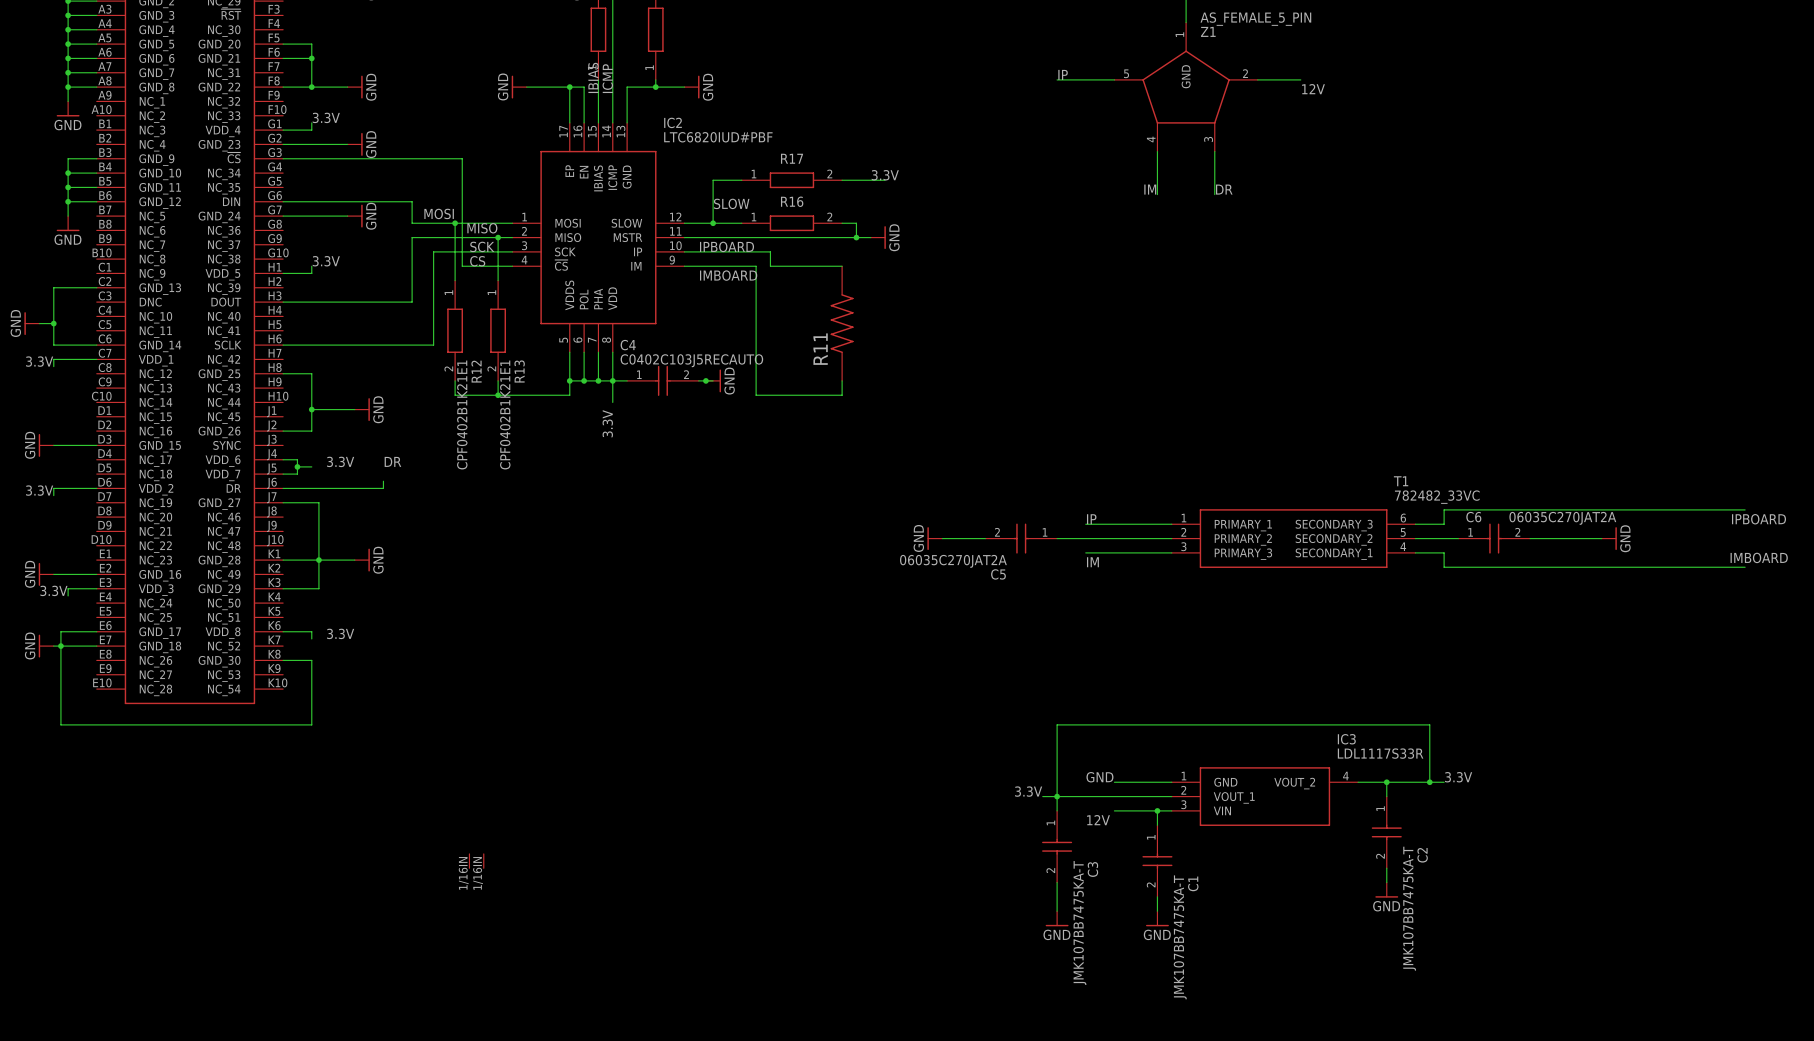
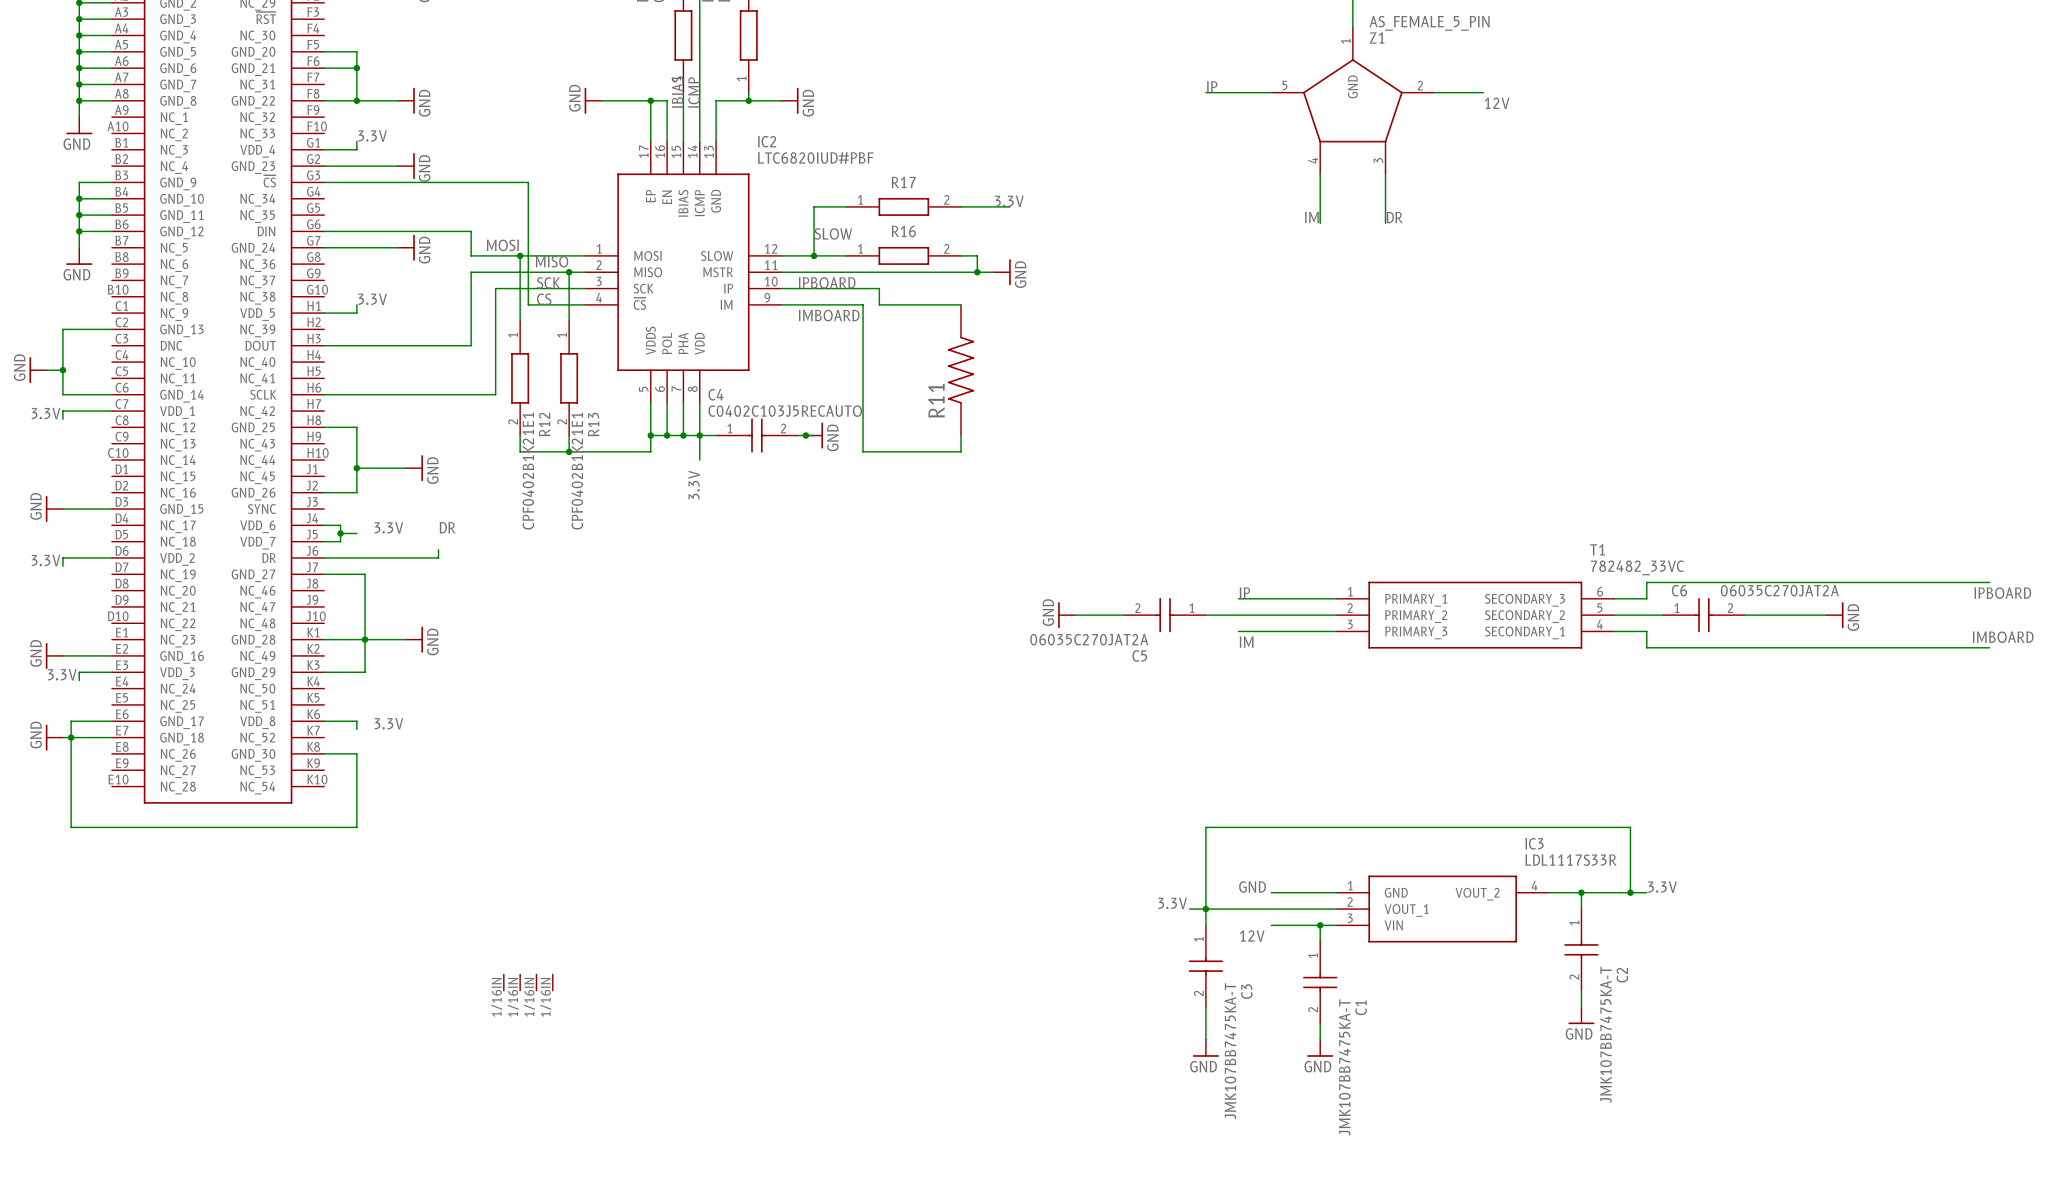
part: none -> (503, 982)
part: none -> (520, 982)

